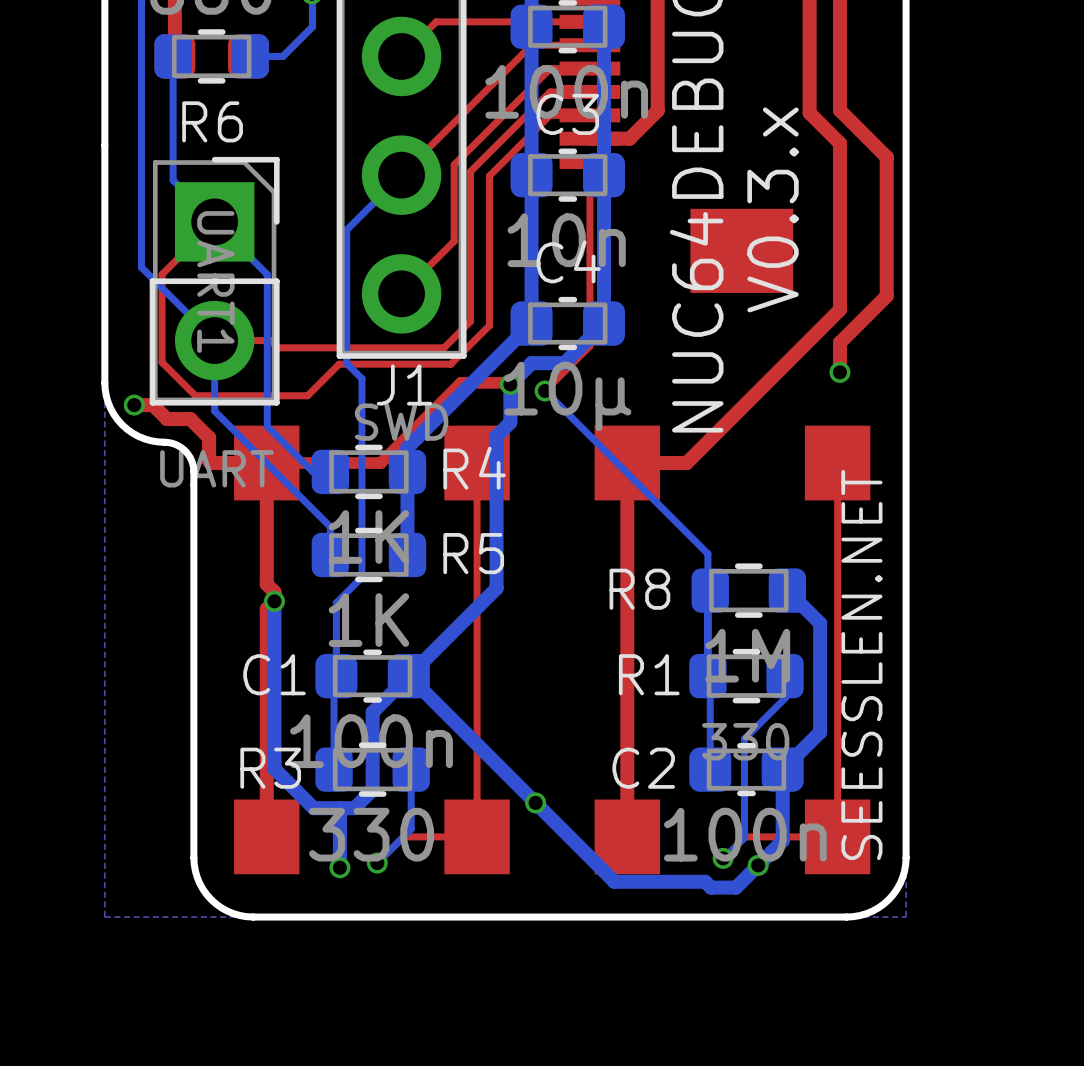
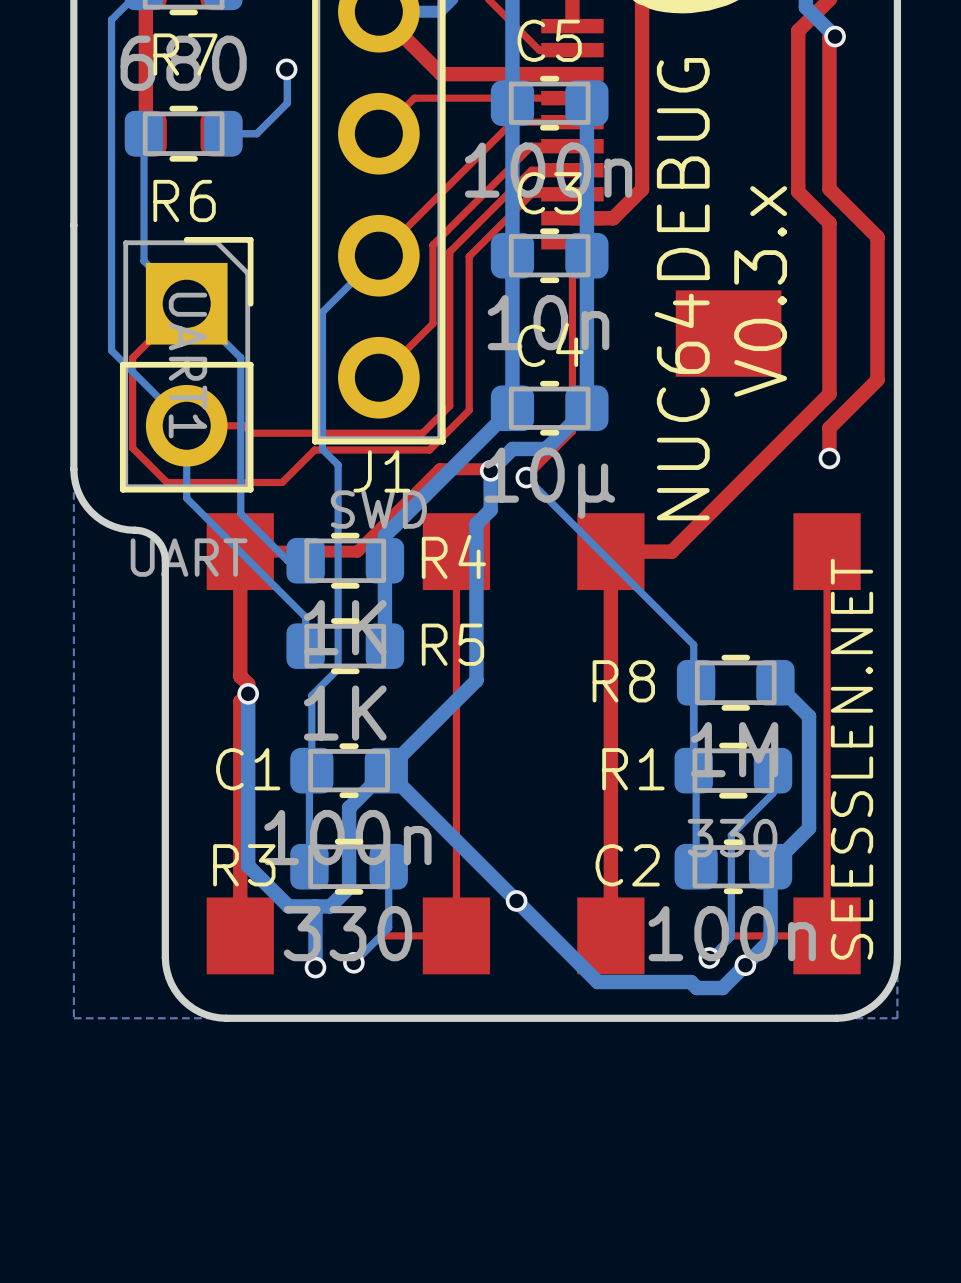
top track: (134, 405) (152, 405) (167, 419) (190, 419) (209, 437) (209, 461) (210, 463) (266, 463) -> none
via: (134, 405) -> none

